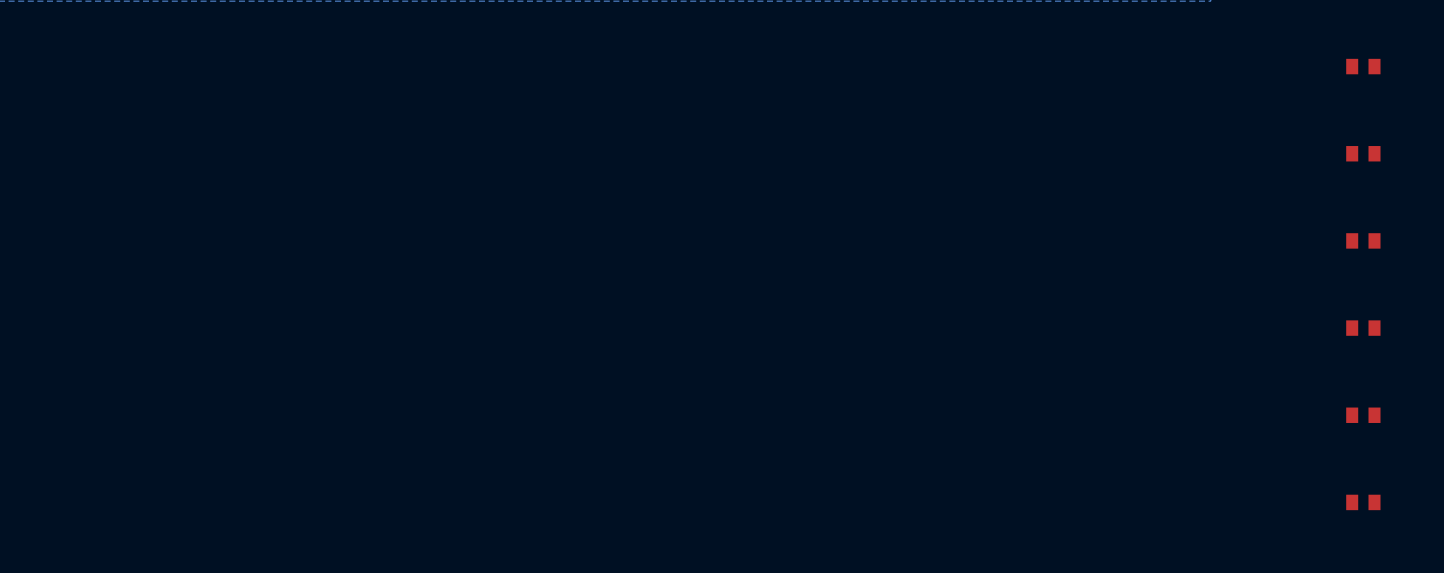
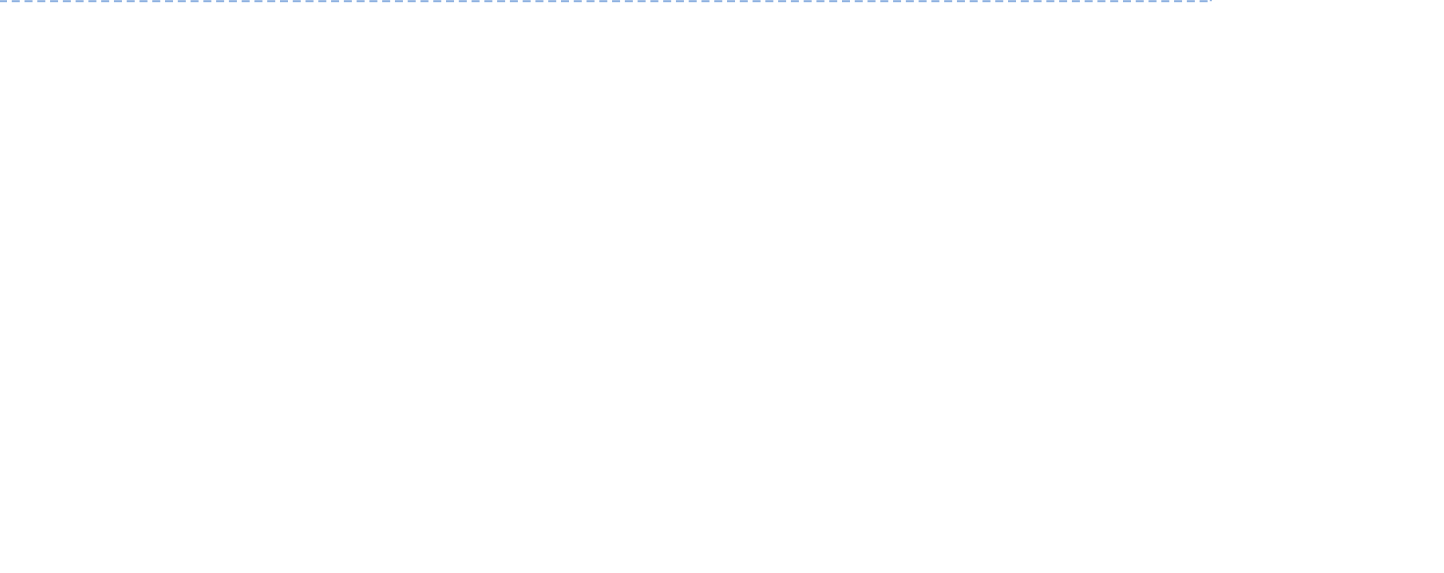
part: (1363, 66) -> none
part: (1363, 153) -> none
part: (1363, 240) -> none
part: (1363, 328) -> none
part: (1363, 415) -> none
part: (1363, 502) -> none

